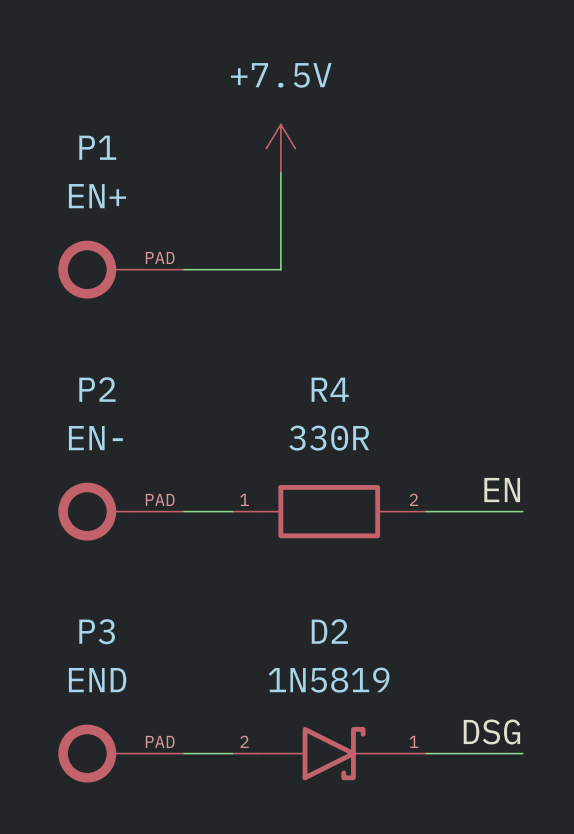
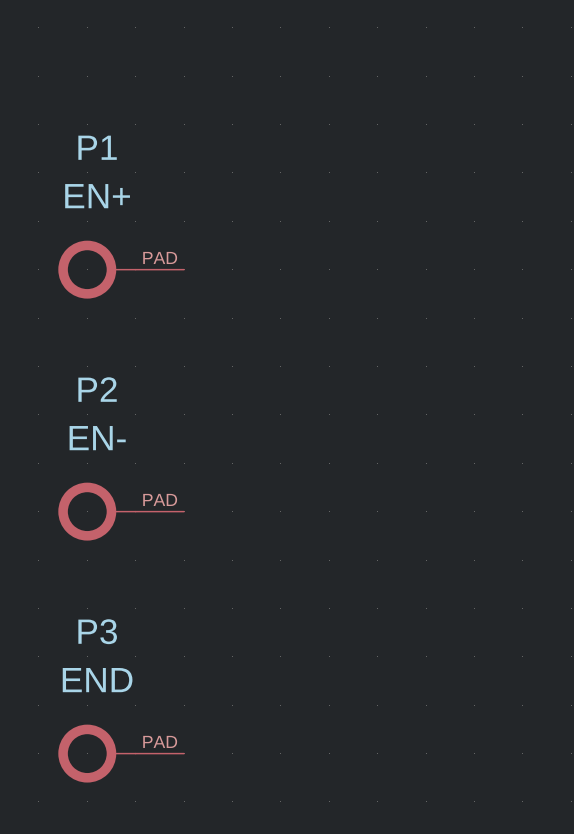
power symbol: +7.5V (280, 148) -> none
wire: (280, 172) (280, 269) (184, 269) -> none
label: EN (502, 490) -> none
wire: (184, 511) (232, 511) -> none
R4: 330R (329, 511) -> none
wire: (426, 511) (522, 511) -> none
label: DSG (491, 732) -> none
wire: (184, 753) (232, 753) -> none
D2: 1N5819 (329, 753) -> none
wire: (426, 753) (522, 753) -> none

